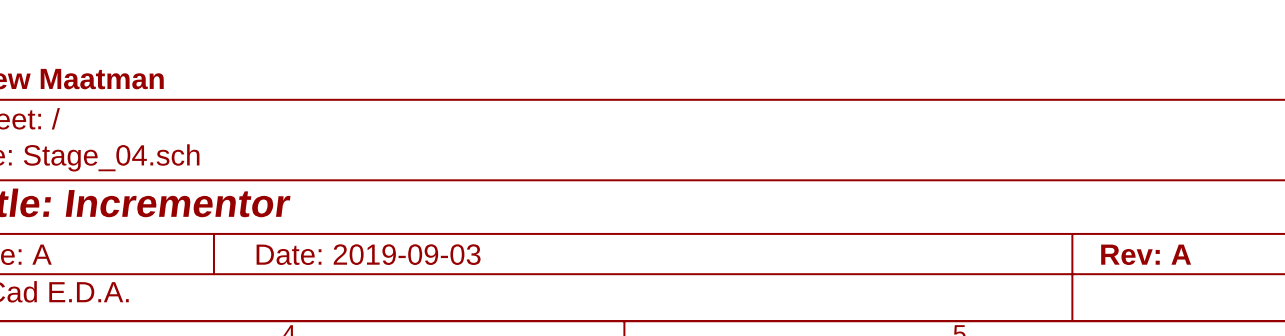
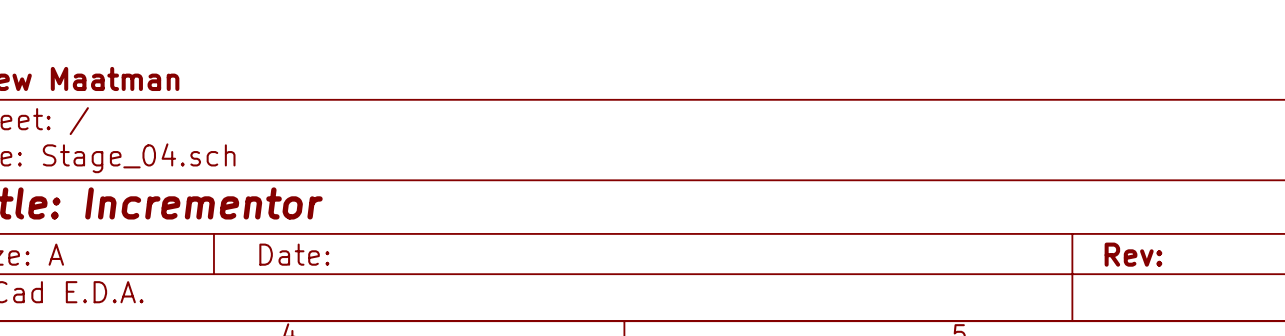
title block: Date: 2019-09-03 (368, 254) -> Date: (294, 254)
title block: Rev: A (1146, 254) -> Rev: (1133, 254)

